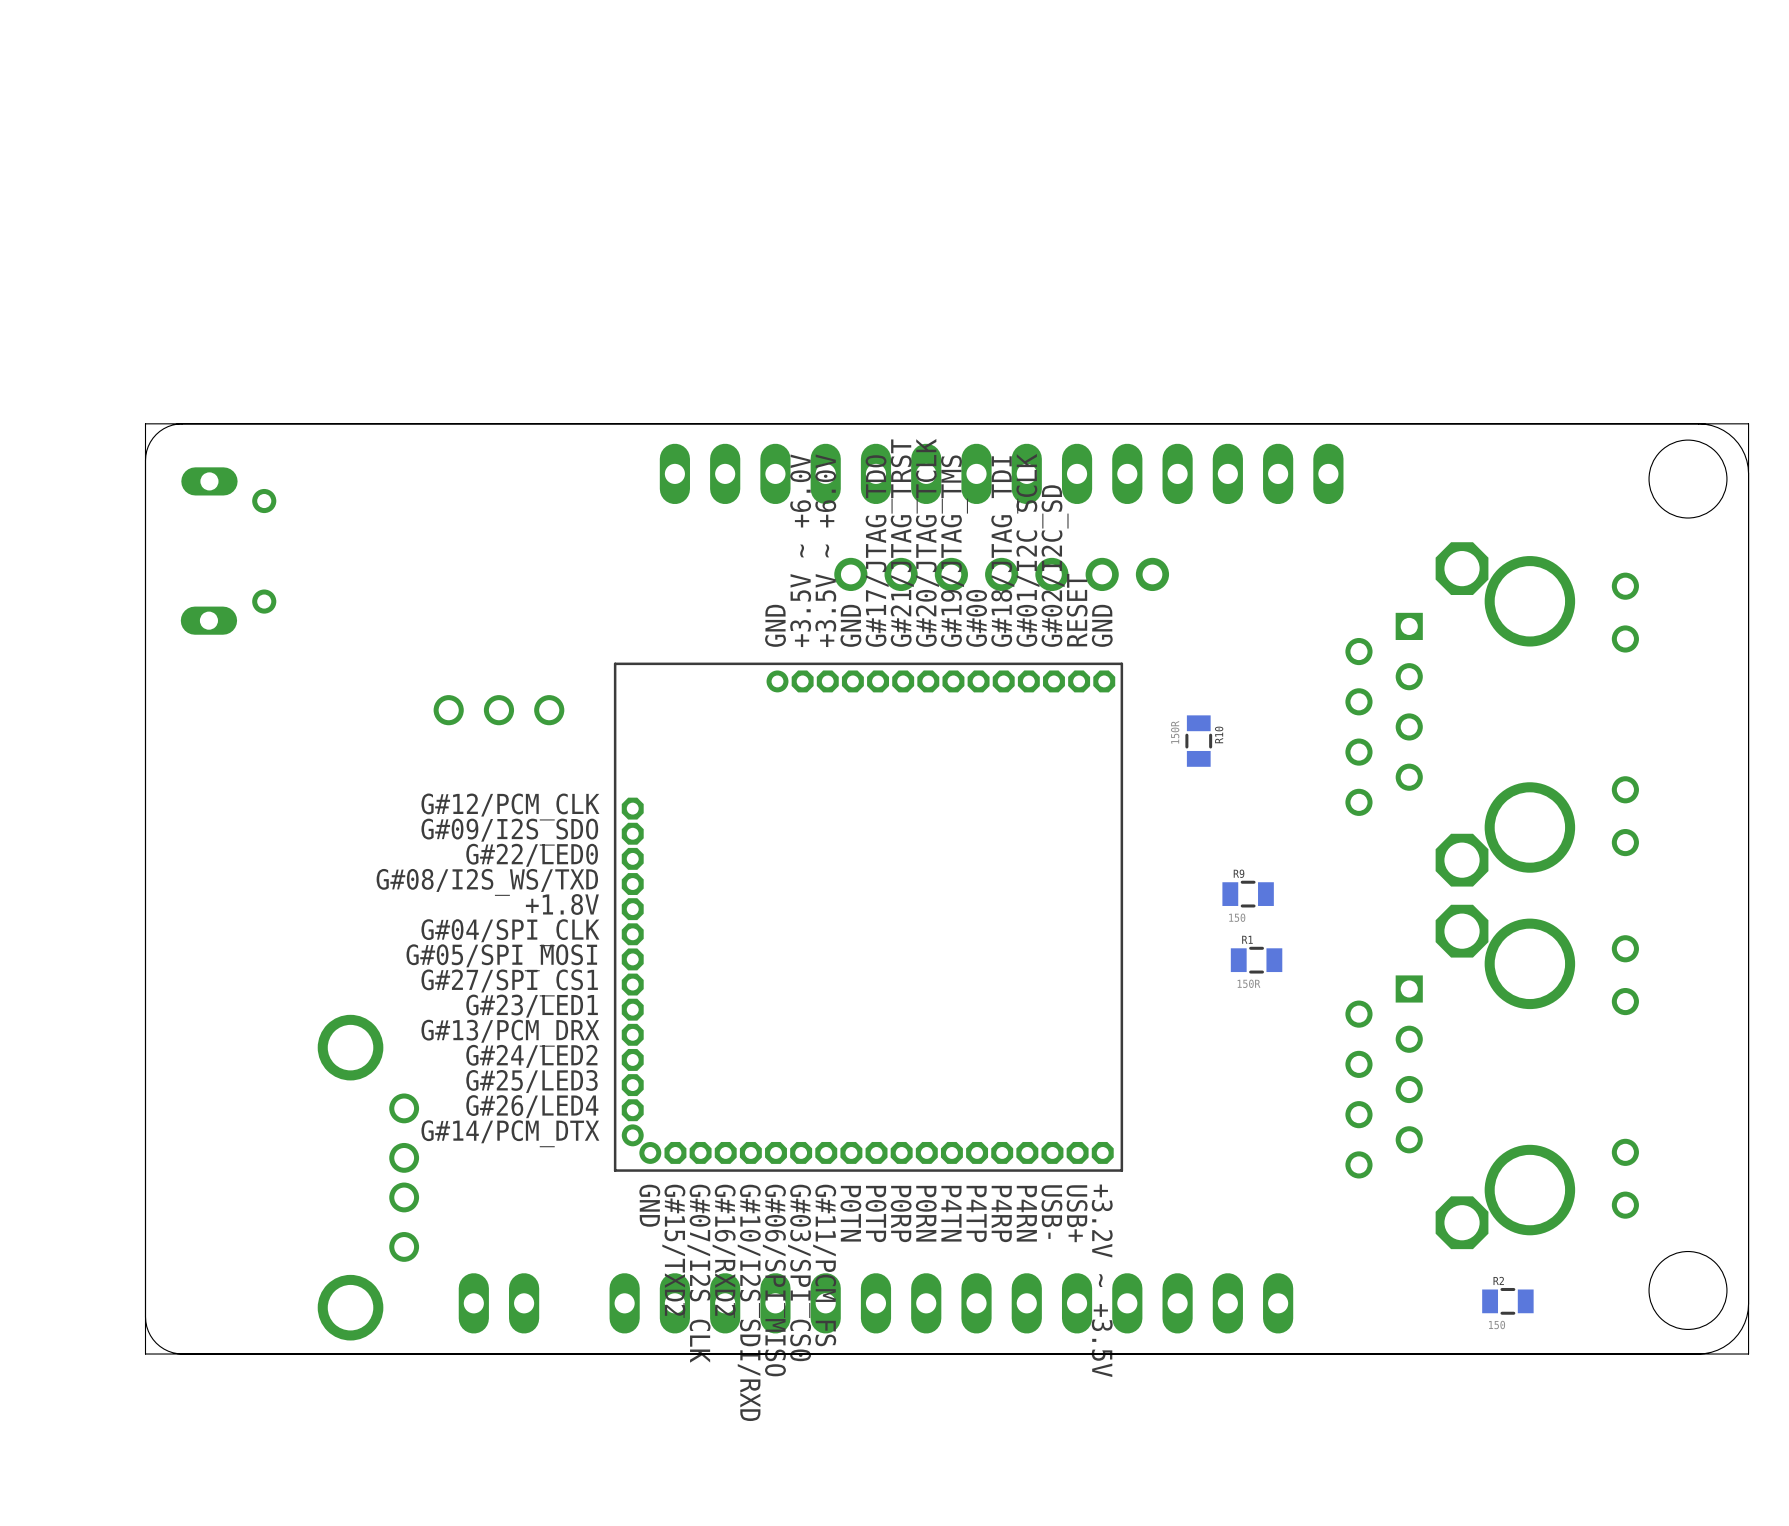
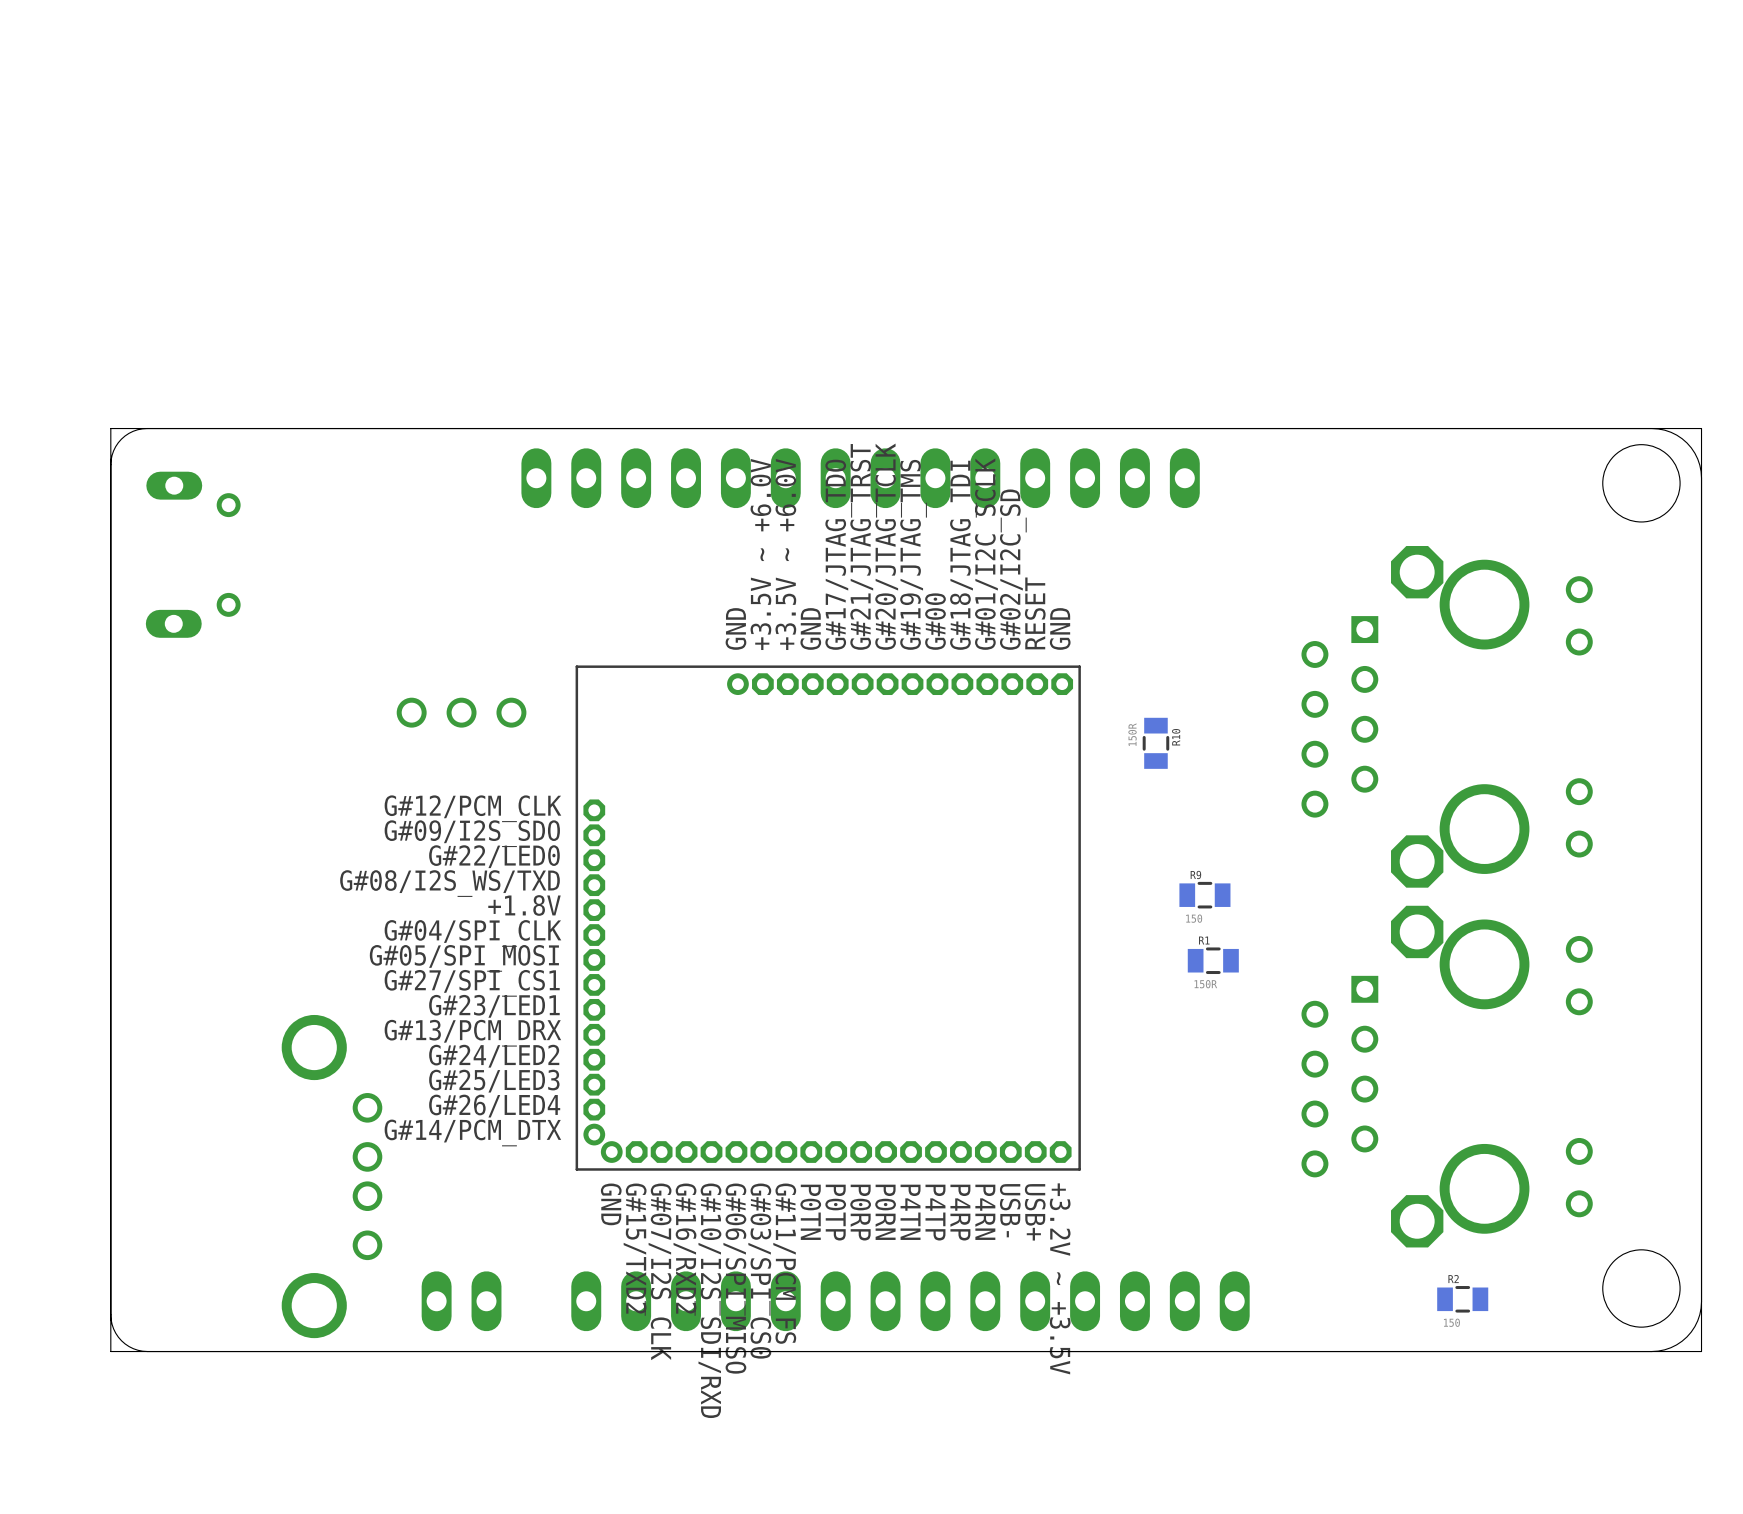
part position: (1001, 473) -> (860, 478)
part: (1001, 574) -> none

